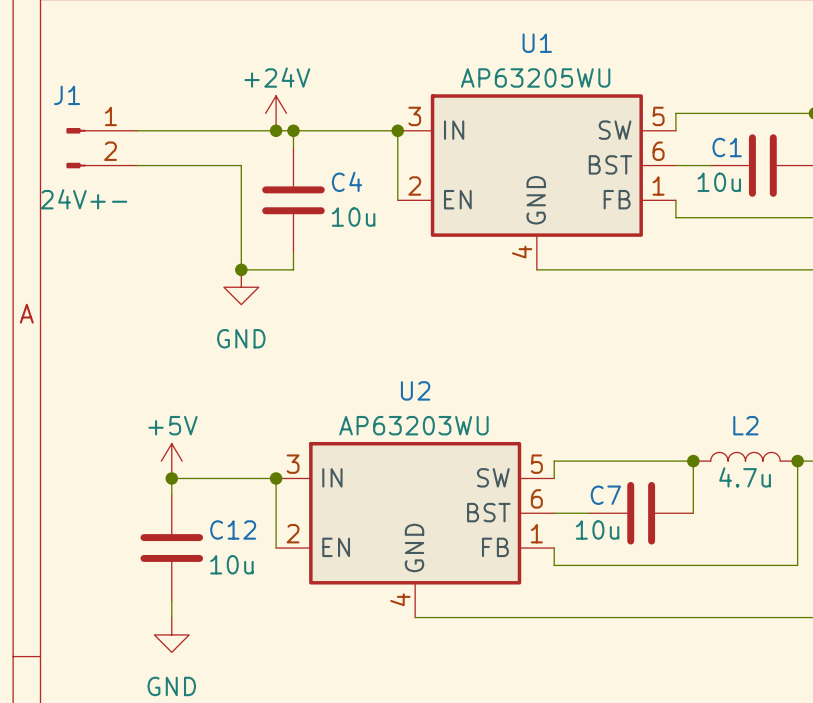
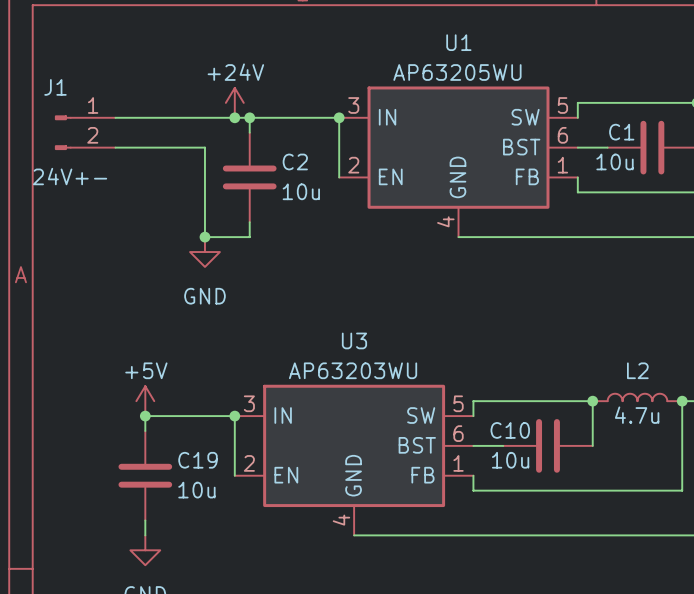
C4 name: C4 (346, 181) -> C2 (295, 161)
U2 name: U2 (415, 390) -> U3 (354, 340)
C7 name: C7 (605, 495) -> C10 (510, 430)
C12 name: C12 (233, 529) -> C19 (197, 460)

